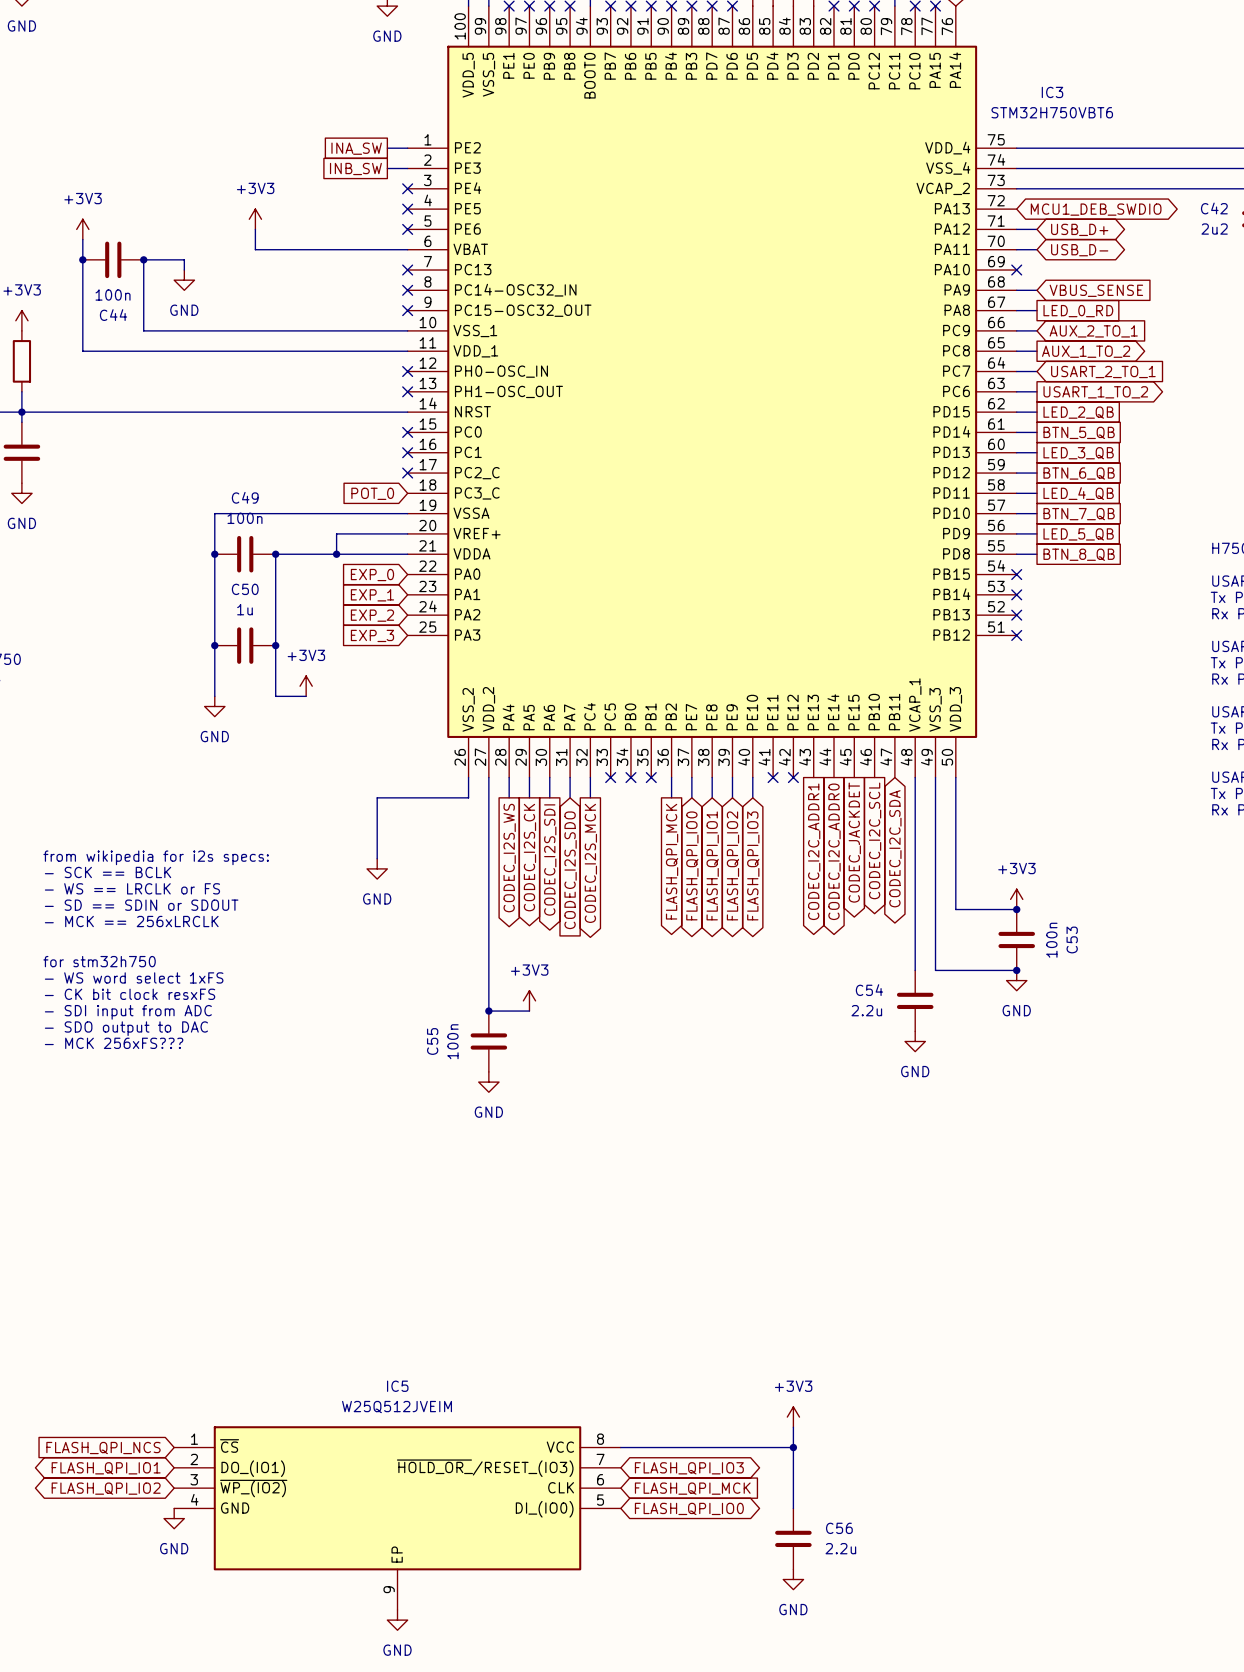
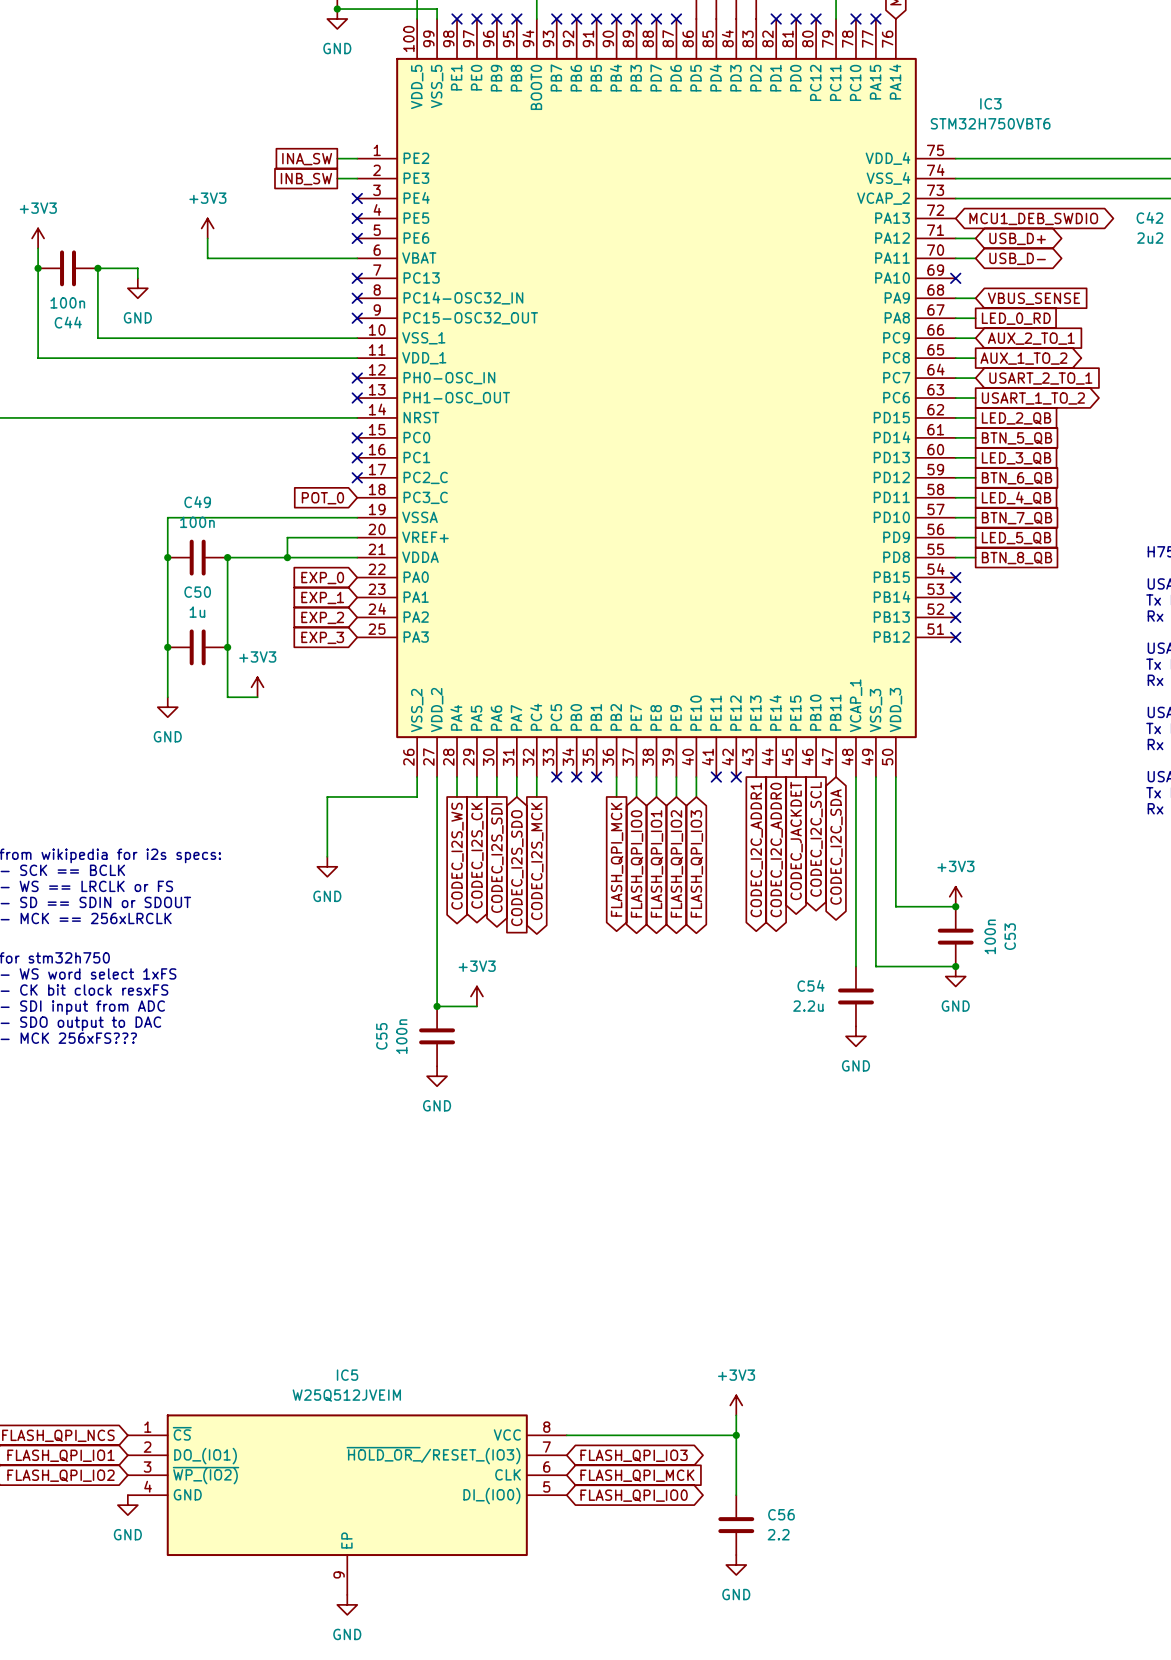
C56 value: 2.2u (840, 1548) -> 2.2 (778, 1534)

